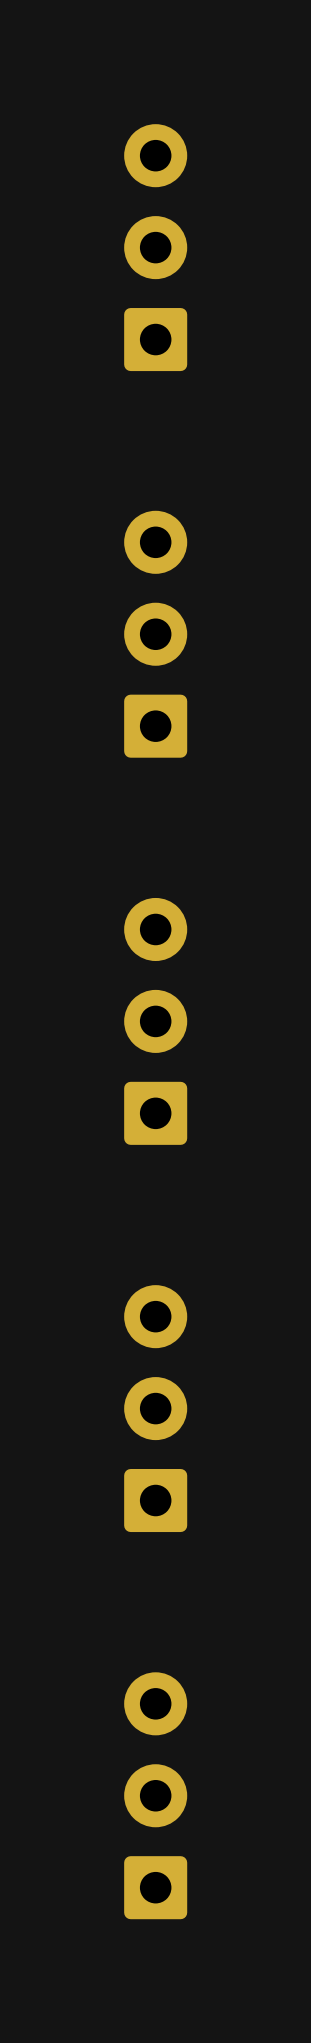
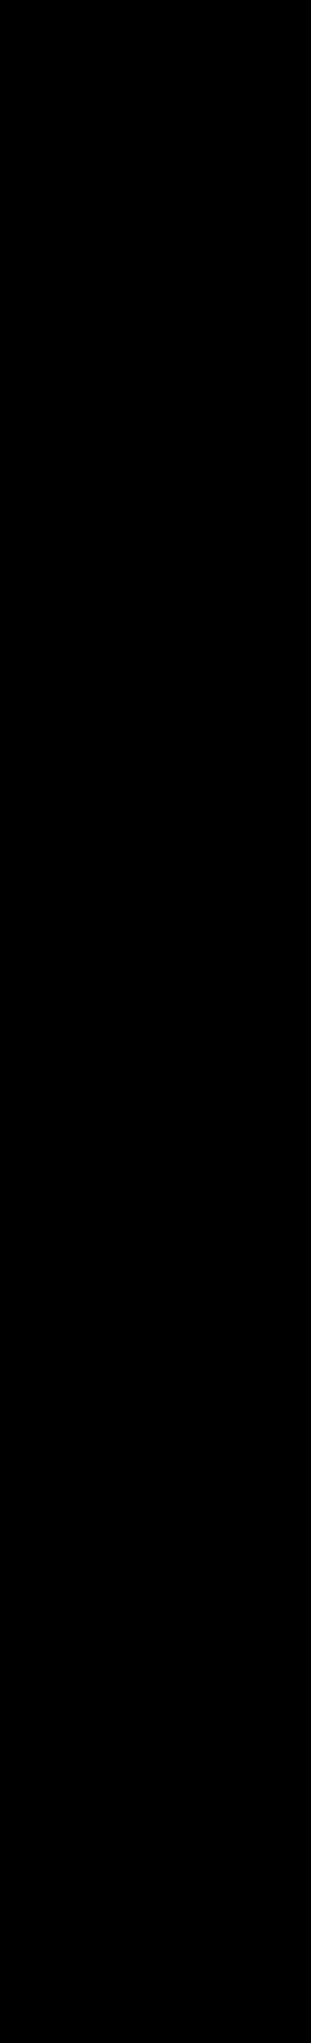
part: (155, 247) -> none
part: (155, 634) -> none
part: (155, 1021) -> none
part: (155, 1408) -> none
part: (155, 1795) -> none

